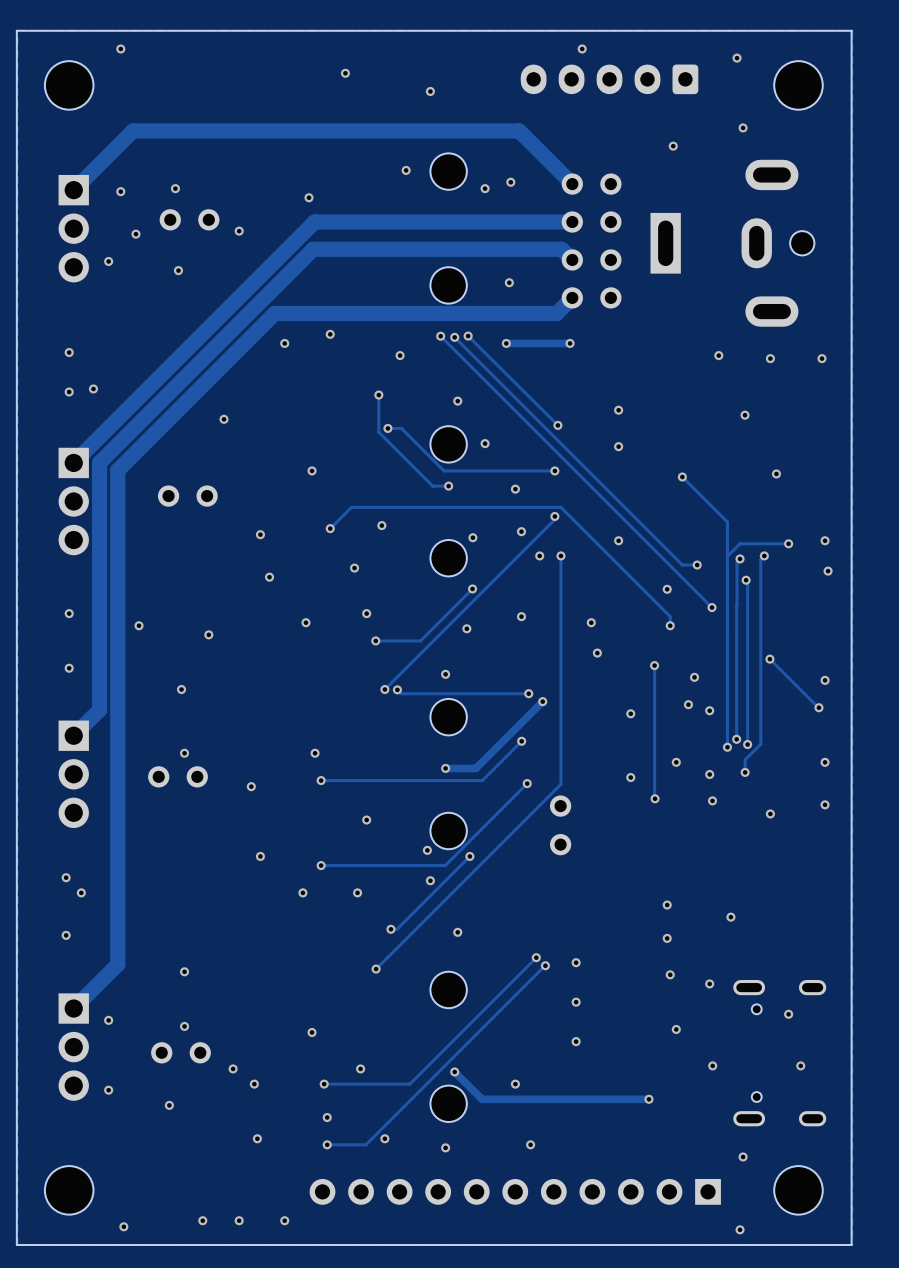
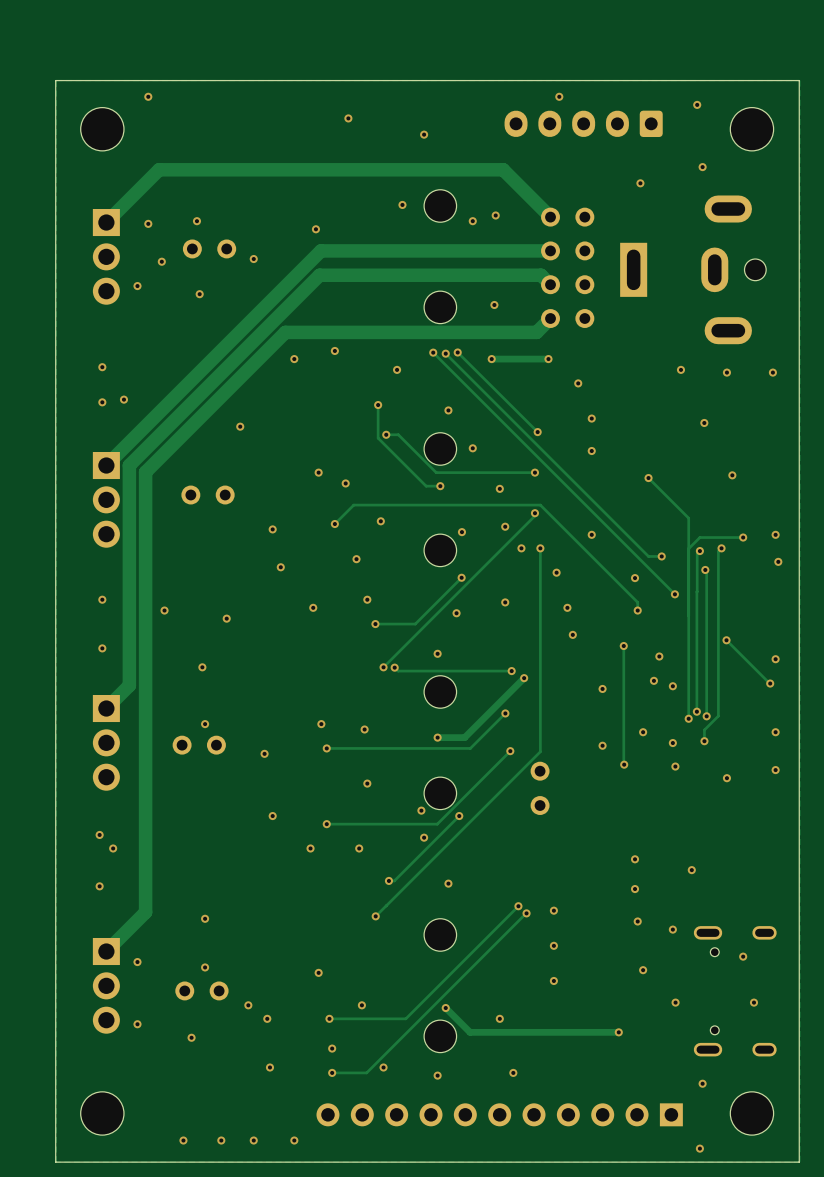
via: none -> (578, 383)
via: none -> (345, 483)
via: none -> (556, 572)
via: none -> (364, 729)
via position: (123, 1226) -> (183, 1140)

